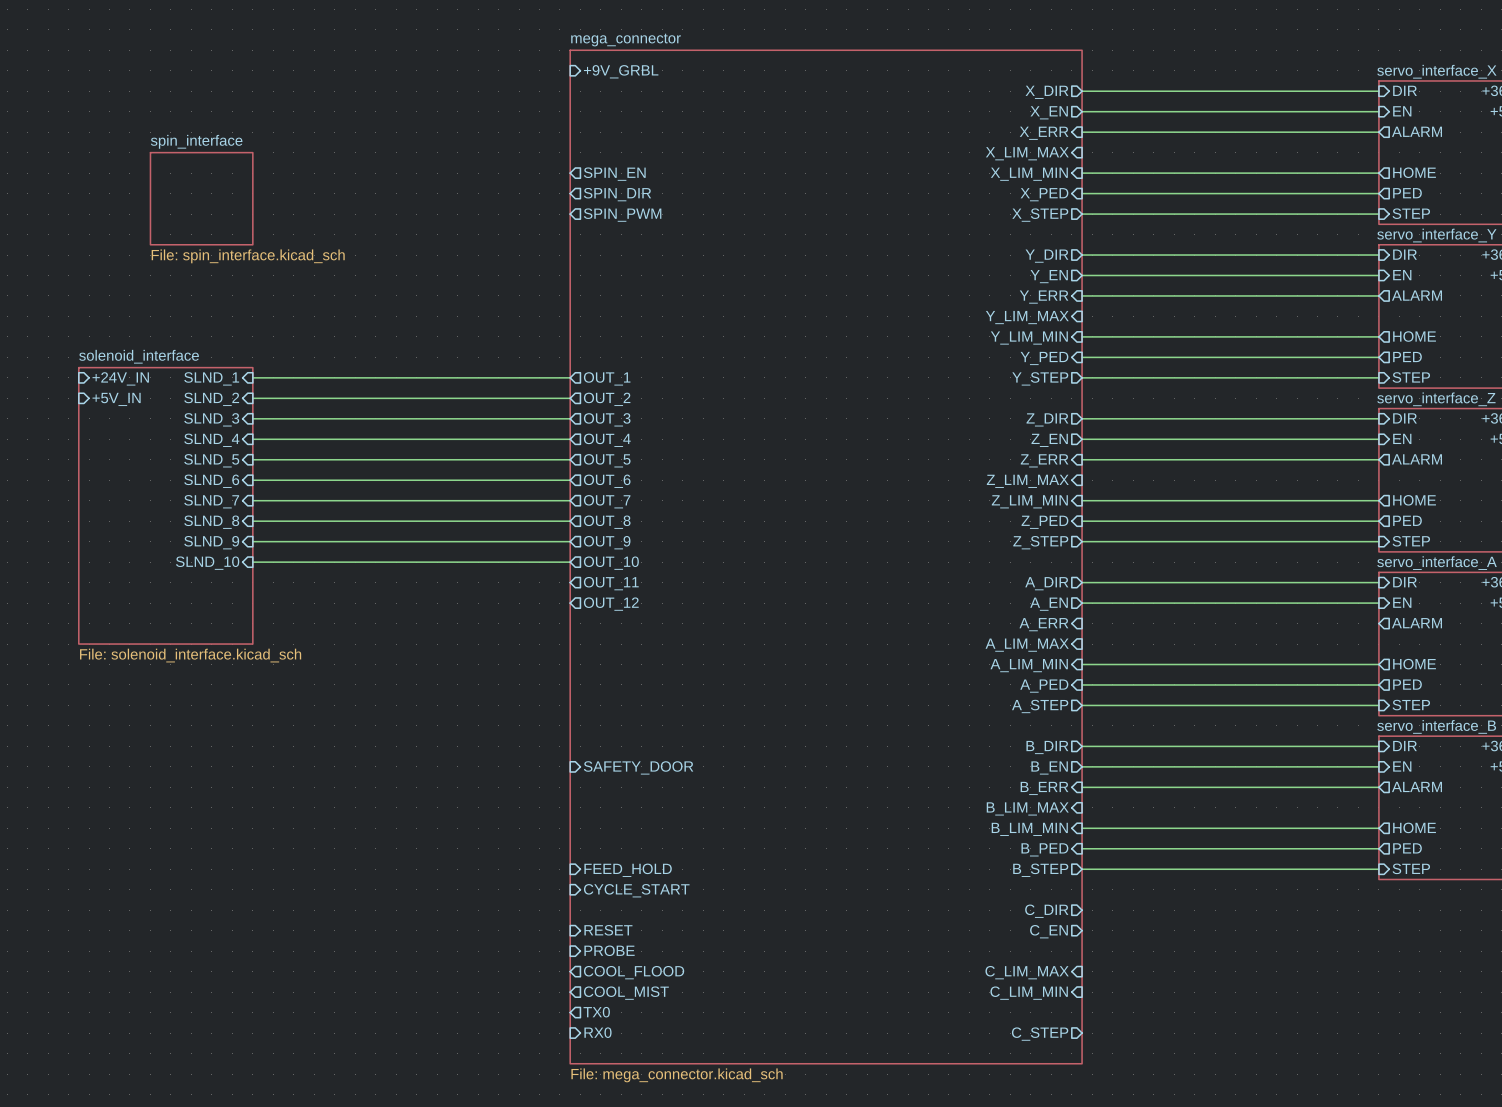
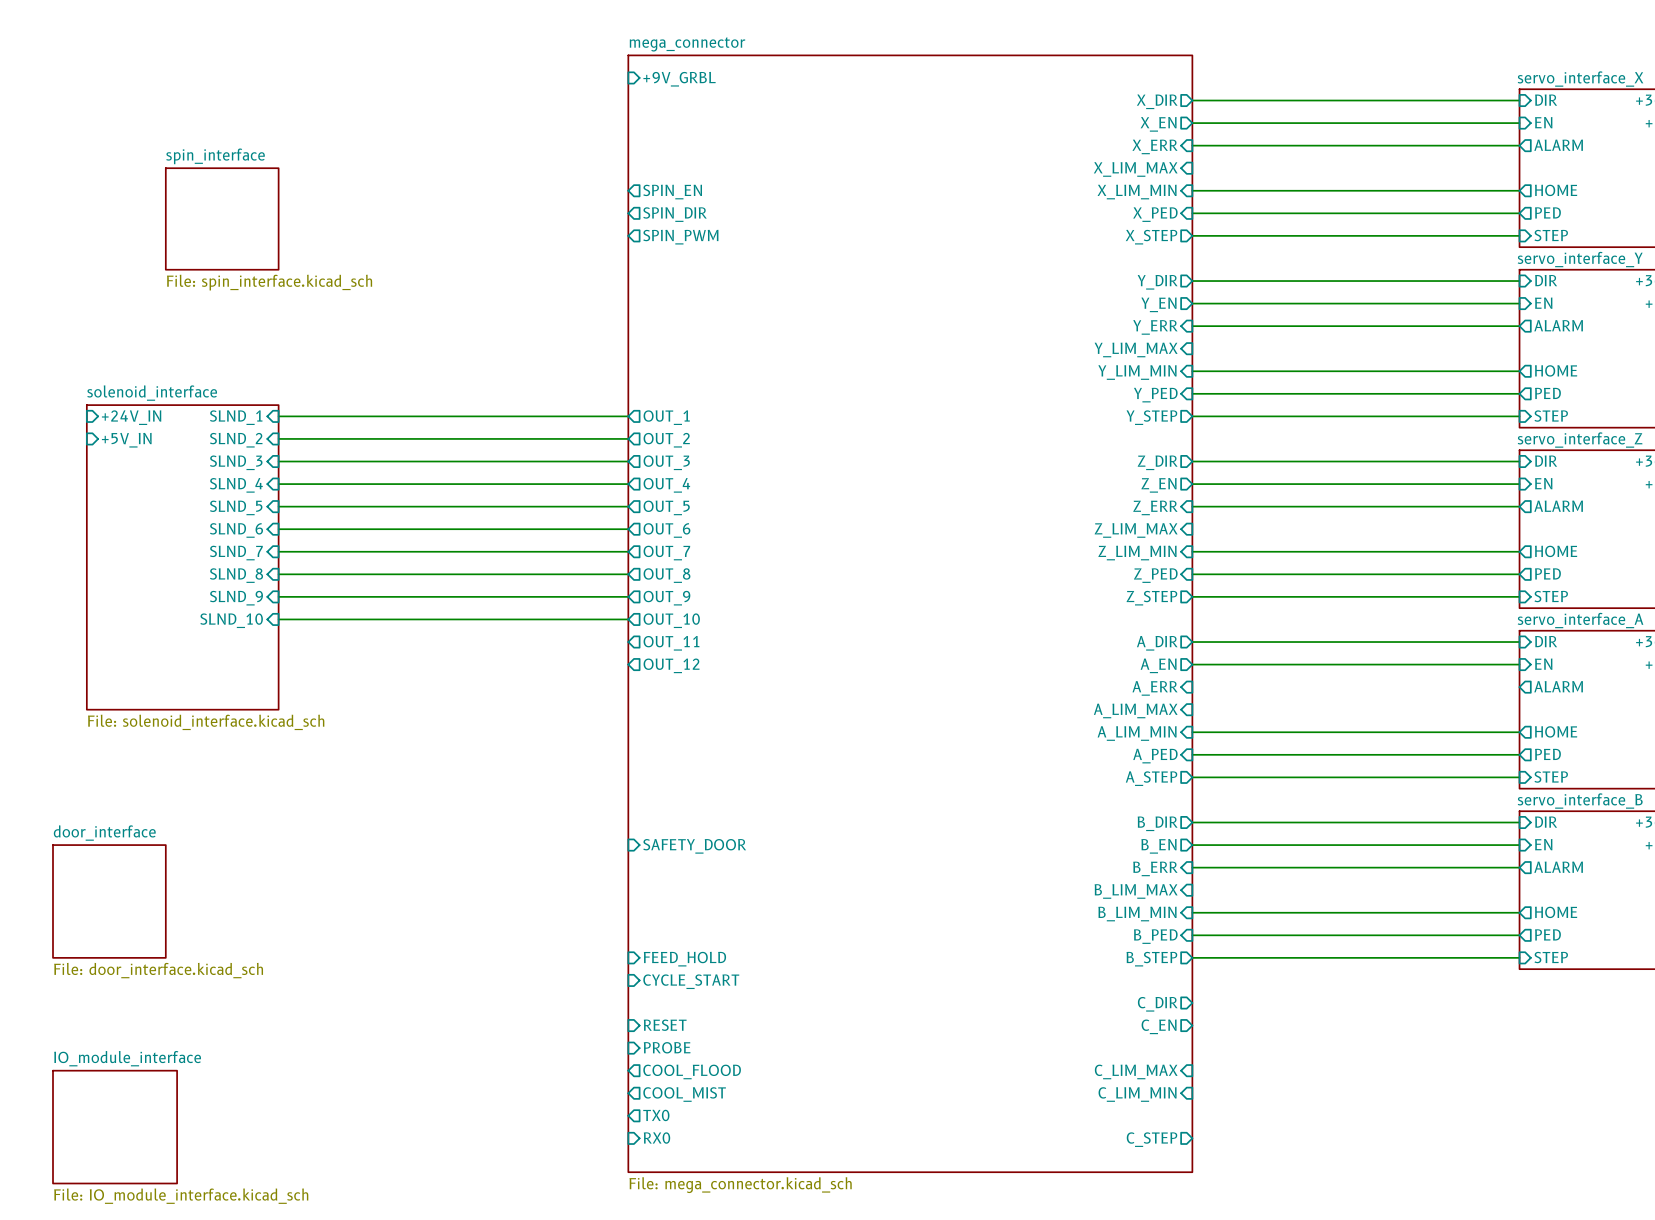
sheet door_interface: none -> File: door_interface.kicad_sch (109, 901)
sheet IO_module_interface: none -> File: IO_module_interface.kicad_sch (115, 1127)

